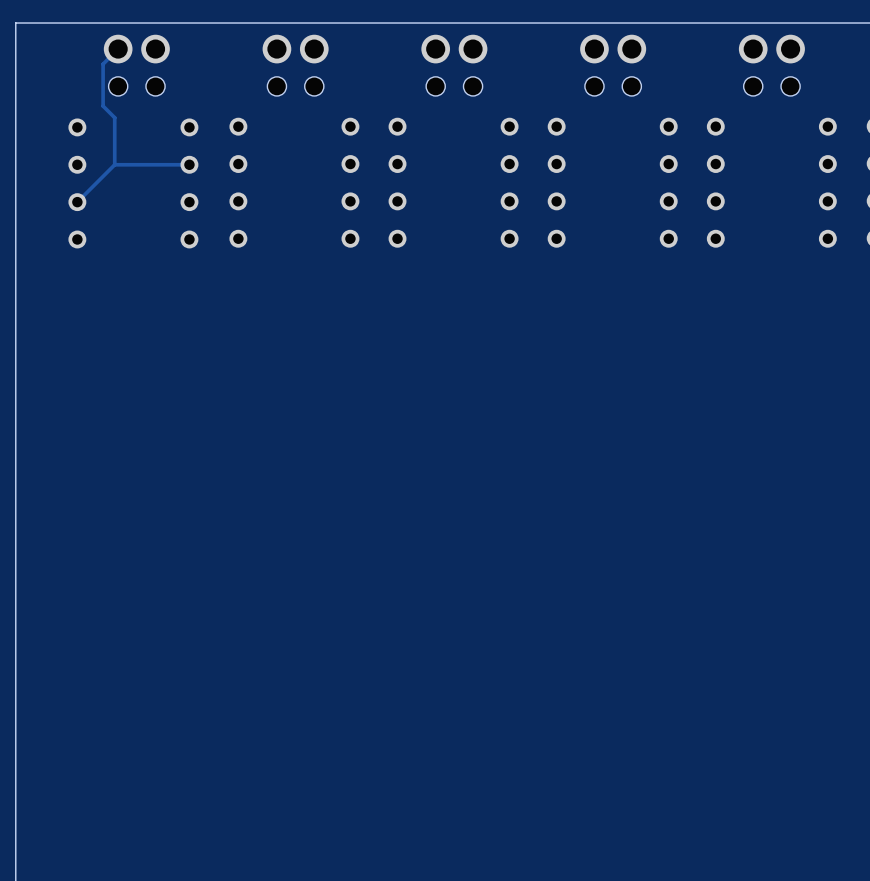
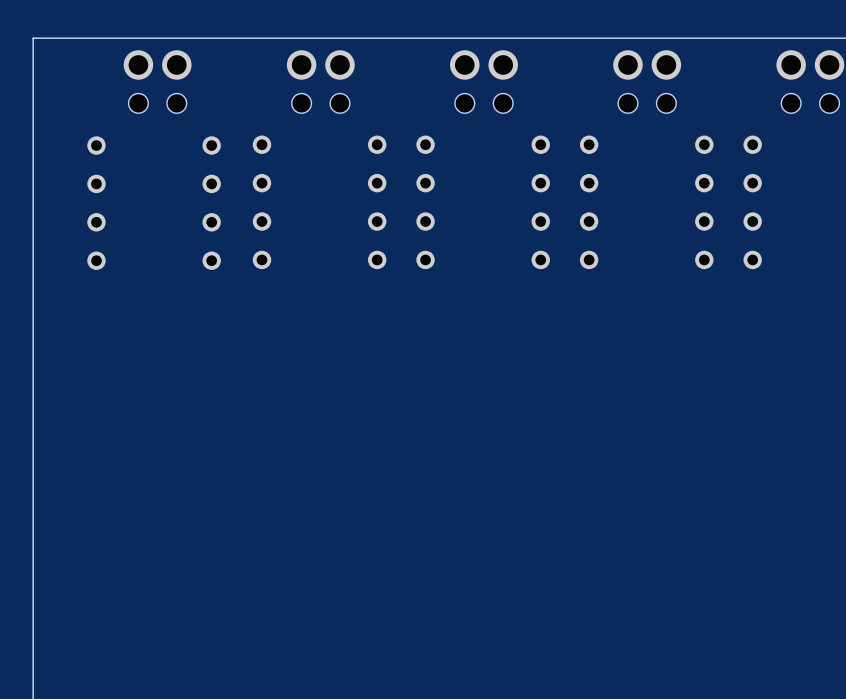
track: (118, 49) (103, 64) (103, 106) (114, 117) (114, 164) -> none
track: (114, 164) (77, 202) -> none
track: (189, 164) (114, 164) -> none

